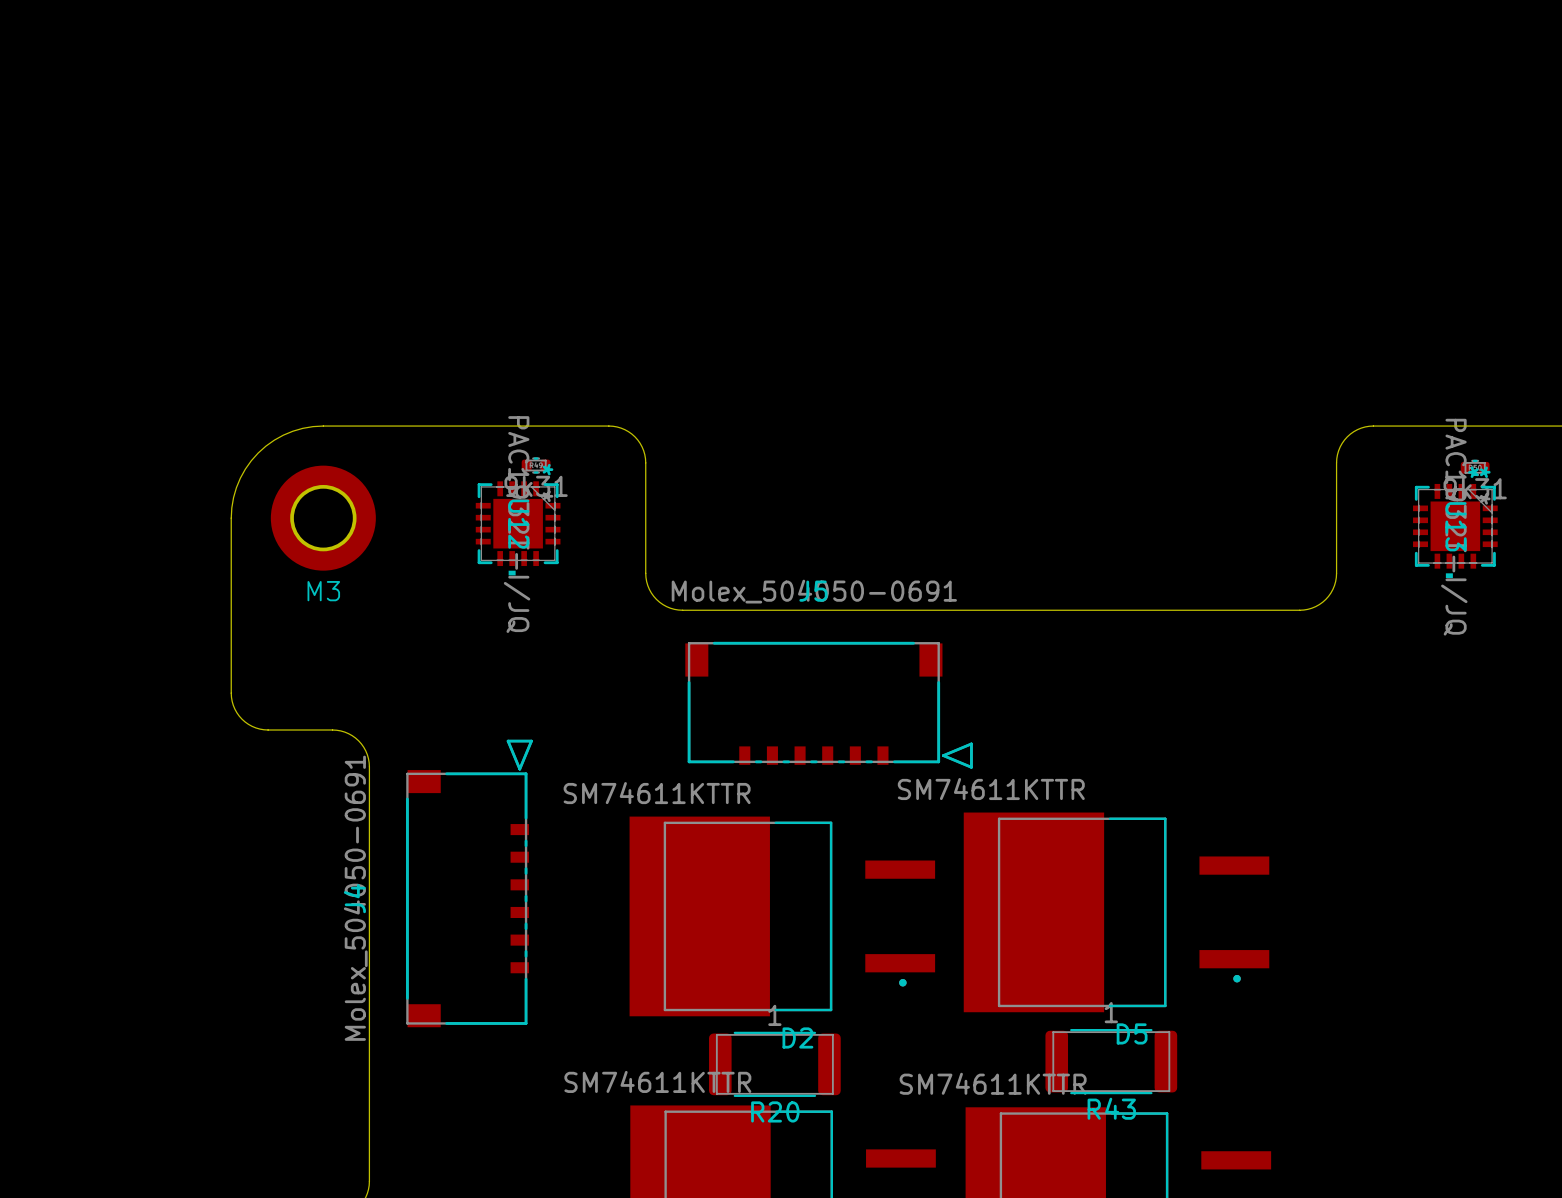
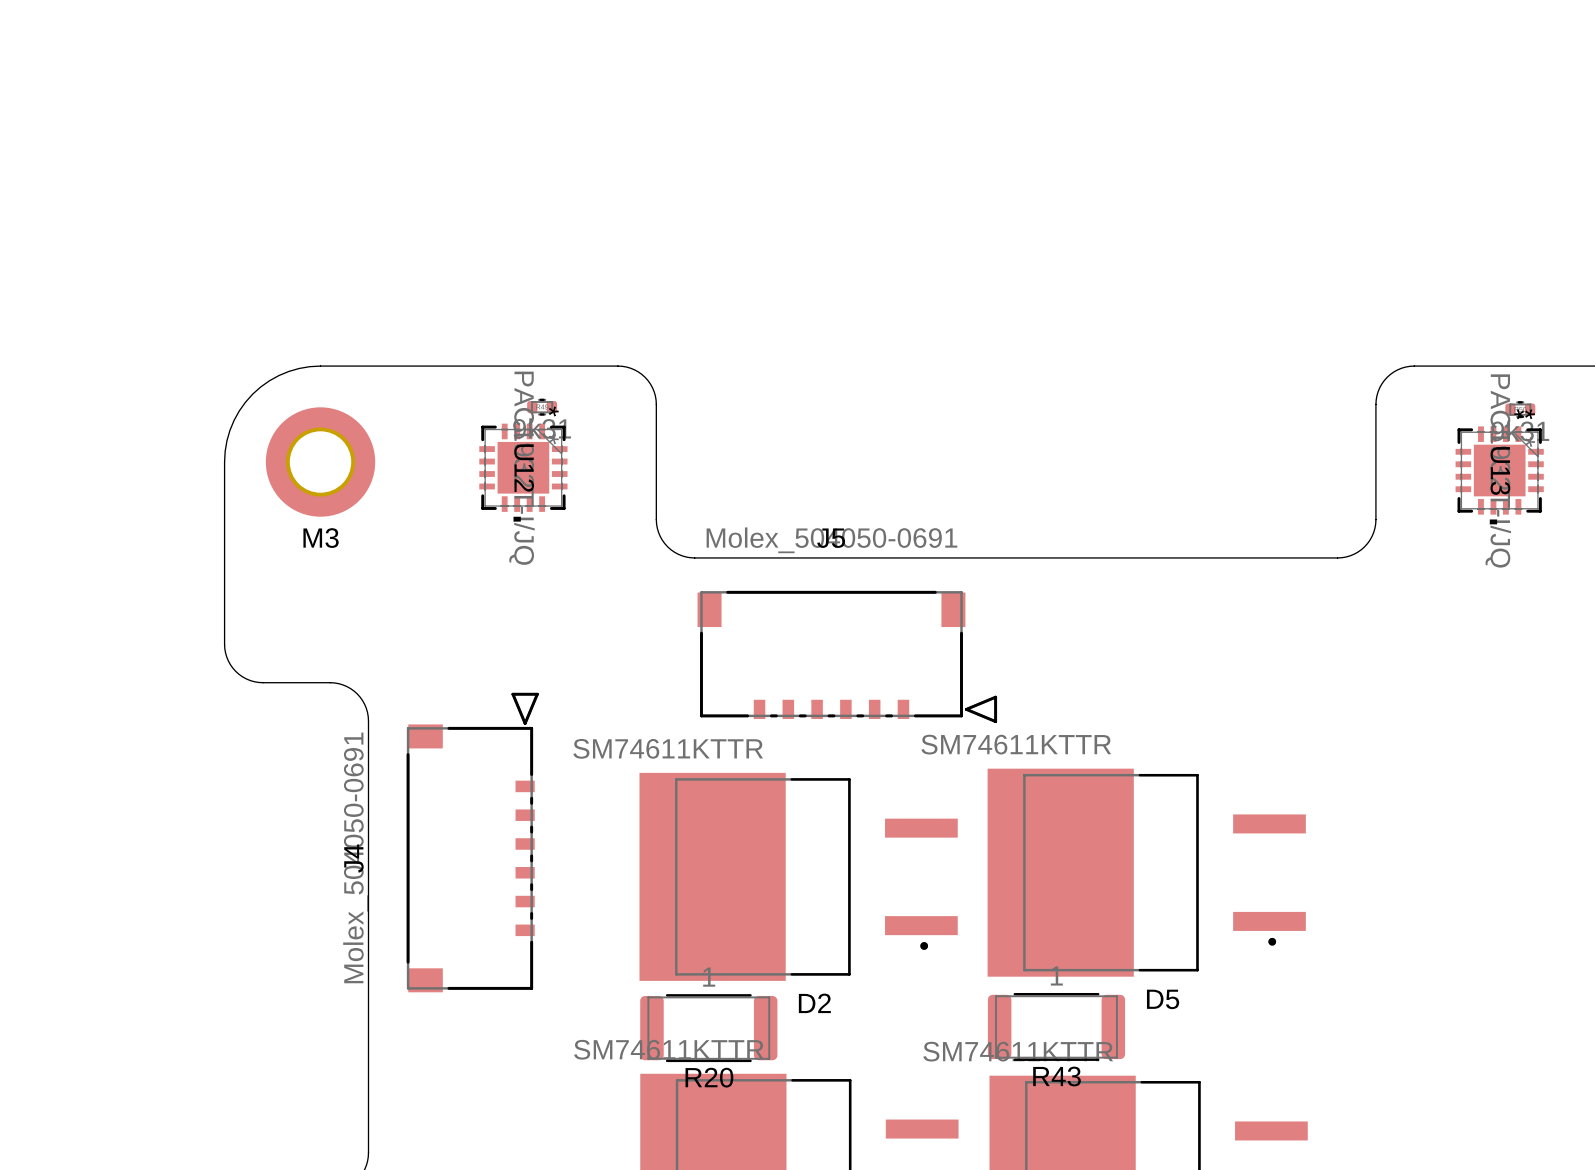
R43 position: (1111, 1061) -> (1056, 1026)
R20 position: (774, 1064) -> (708, 1028)

